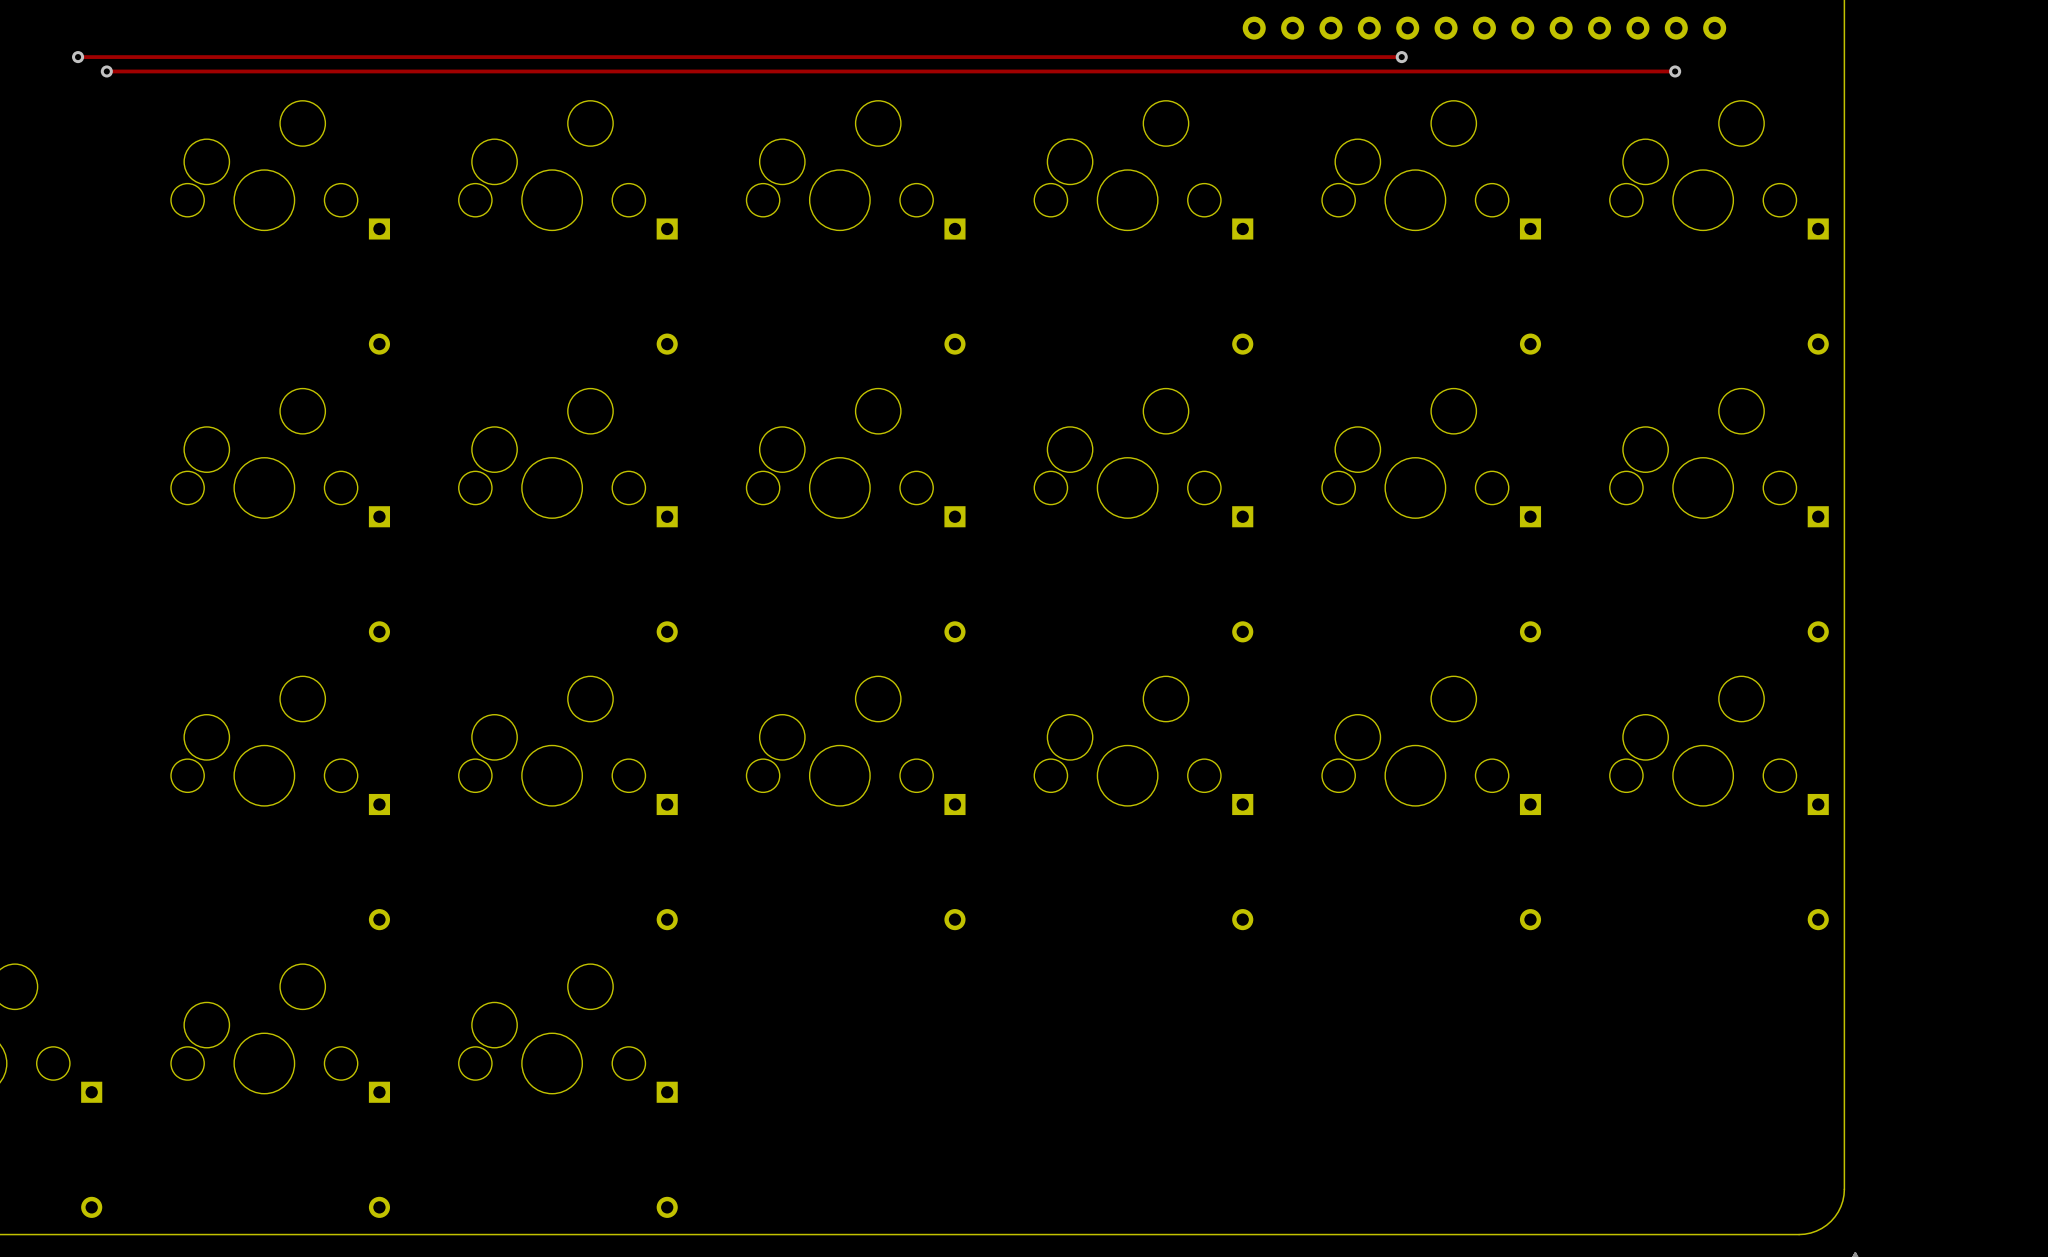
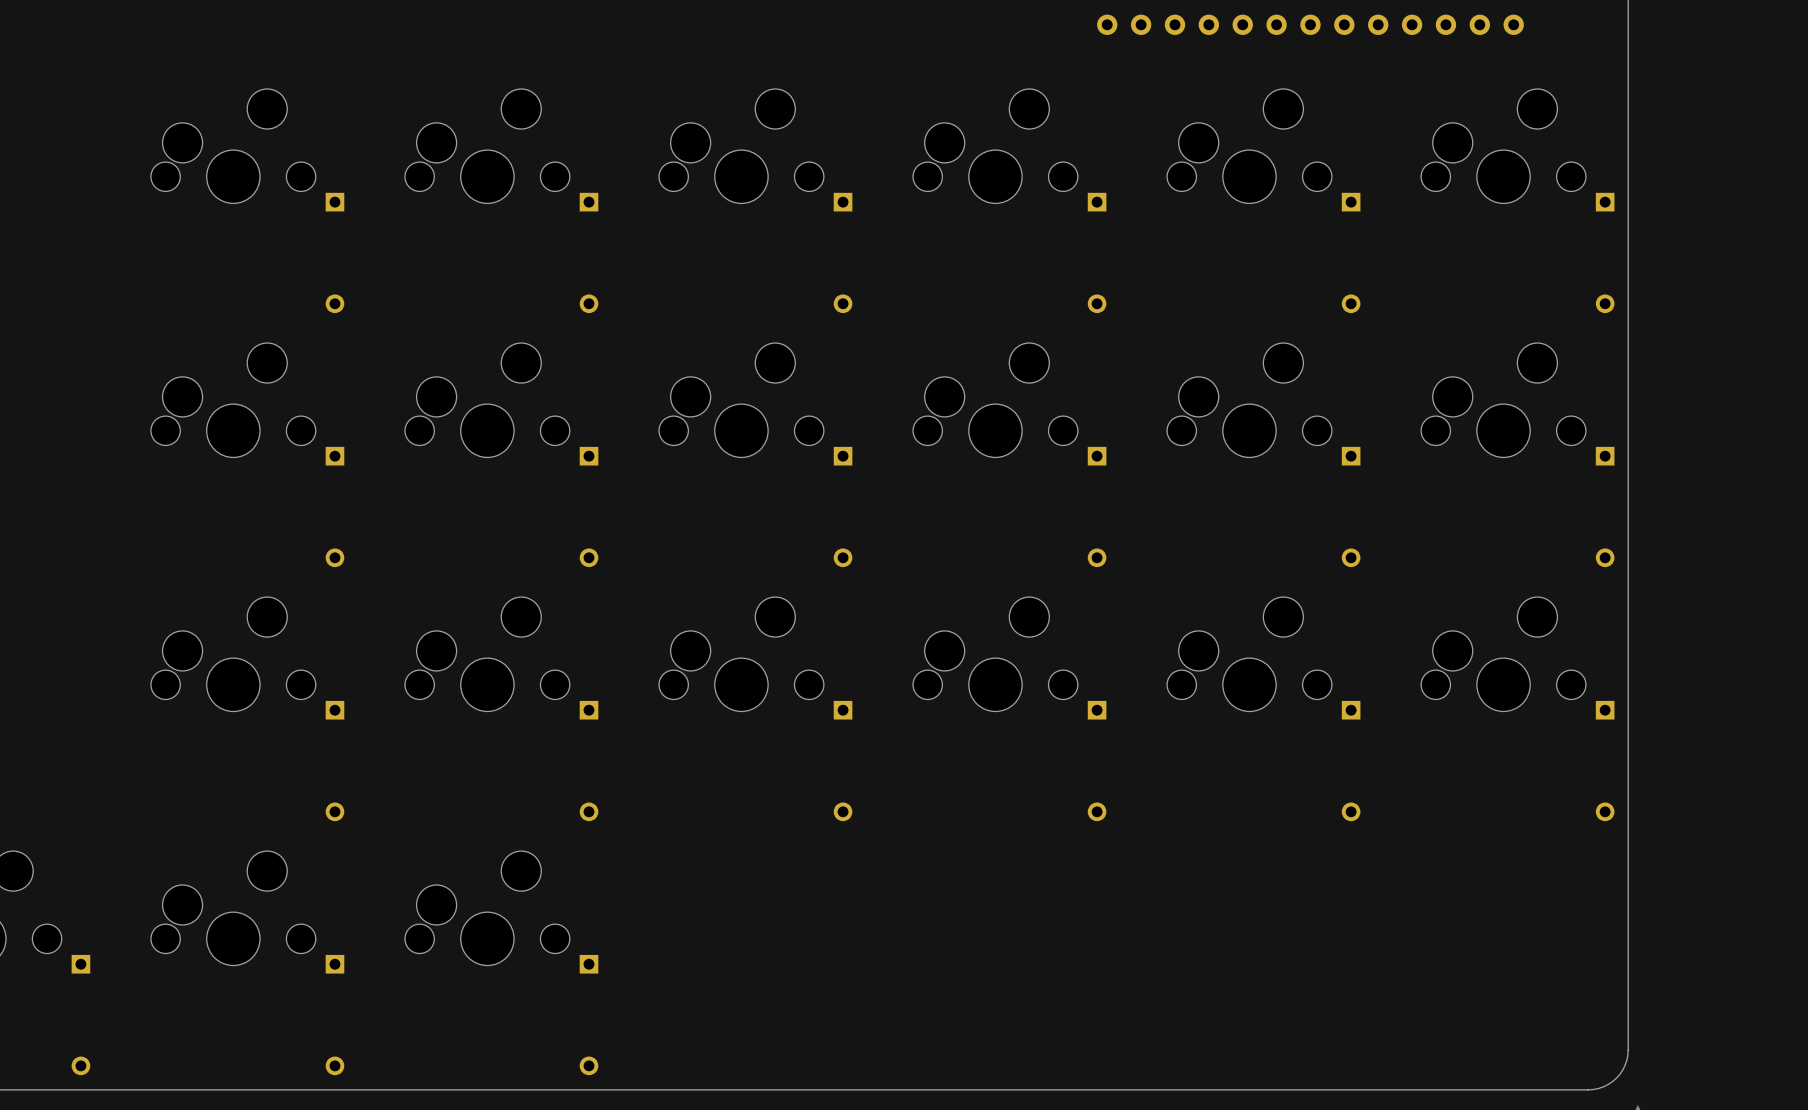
track: (78, 57) (1401, 57) -> none
via: (78, 57) -> none
via: (1401, 57) -> none
track: (106, 71) (1675, 71) -> none
via: (106, 71) -> none
via: (1675, 71) -> none

